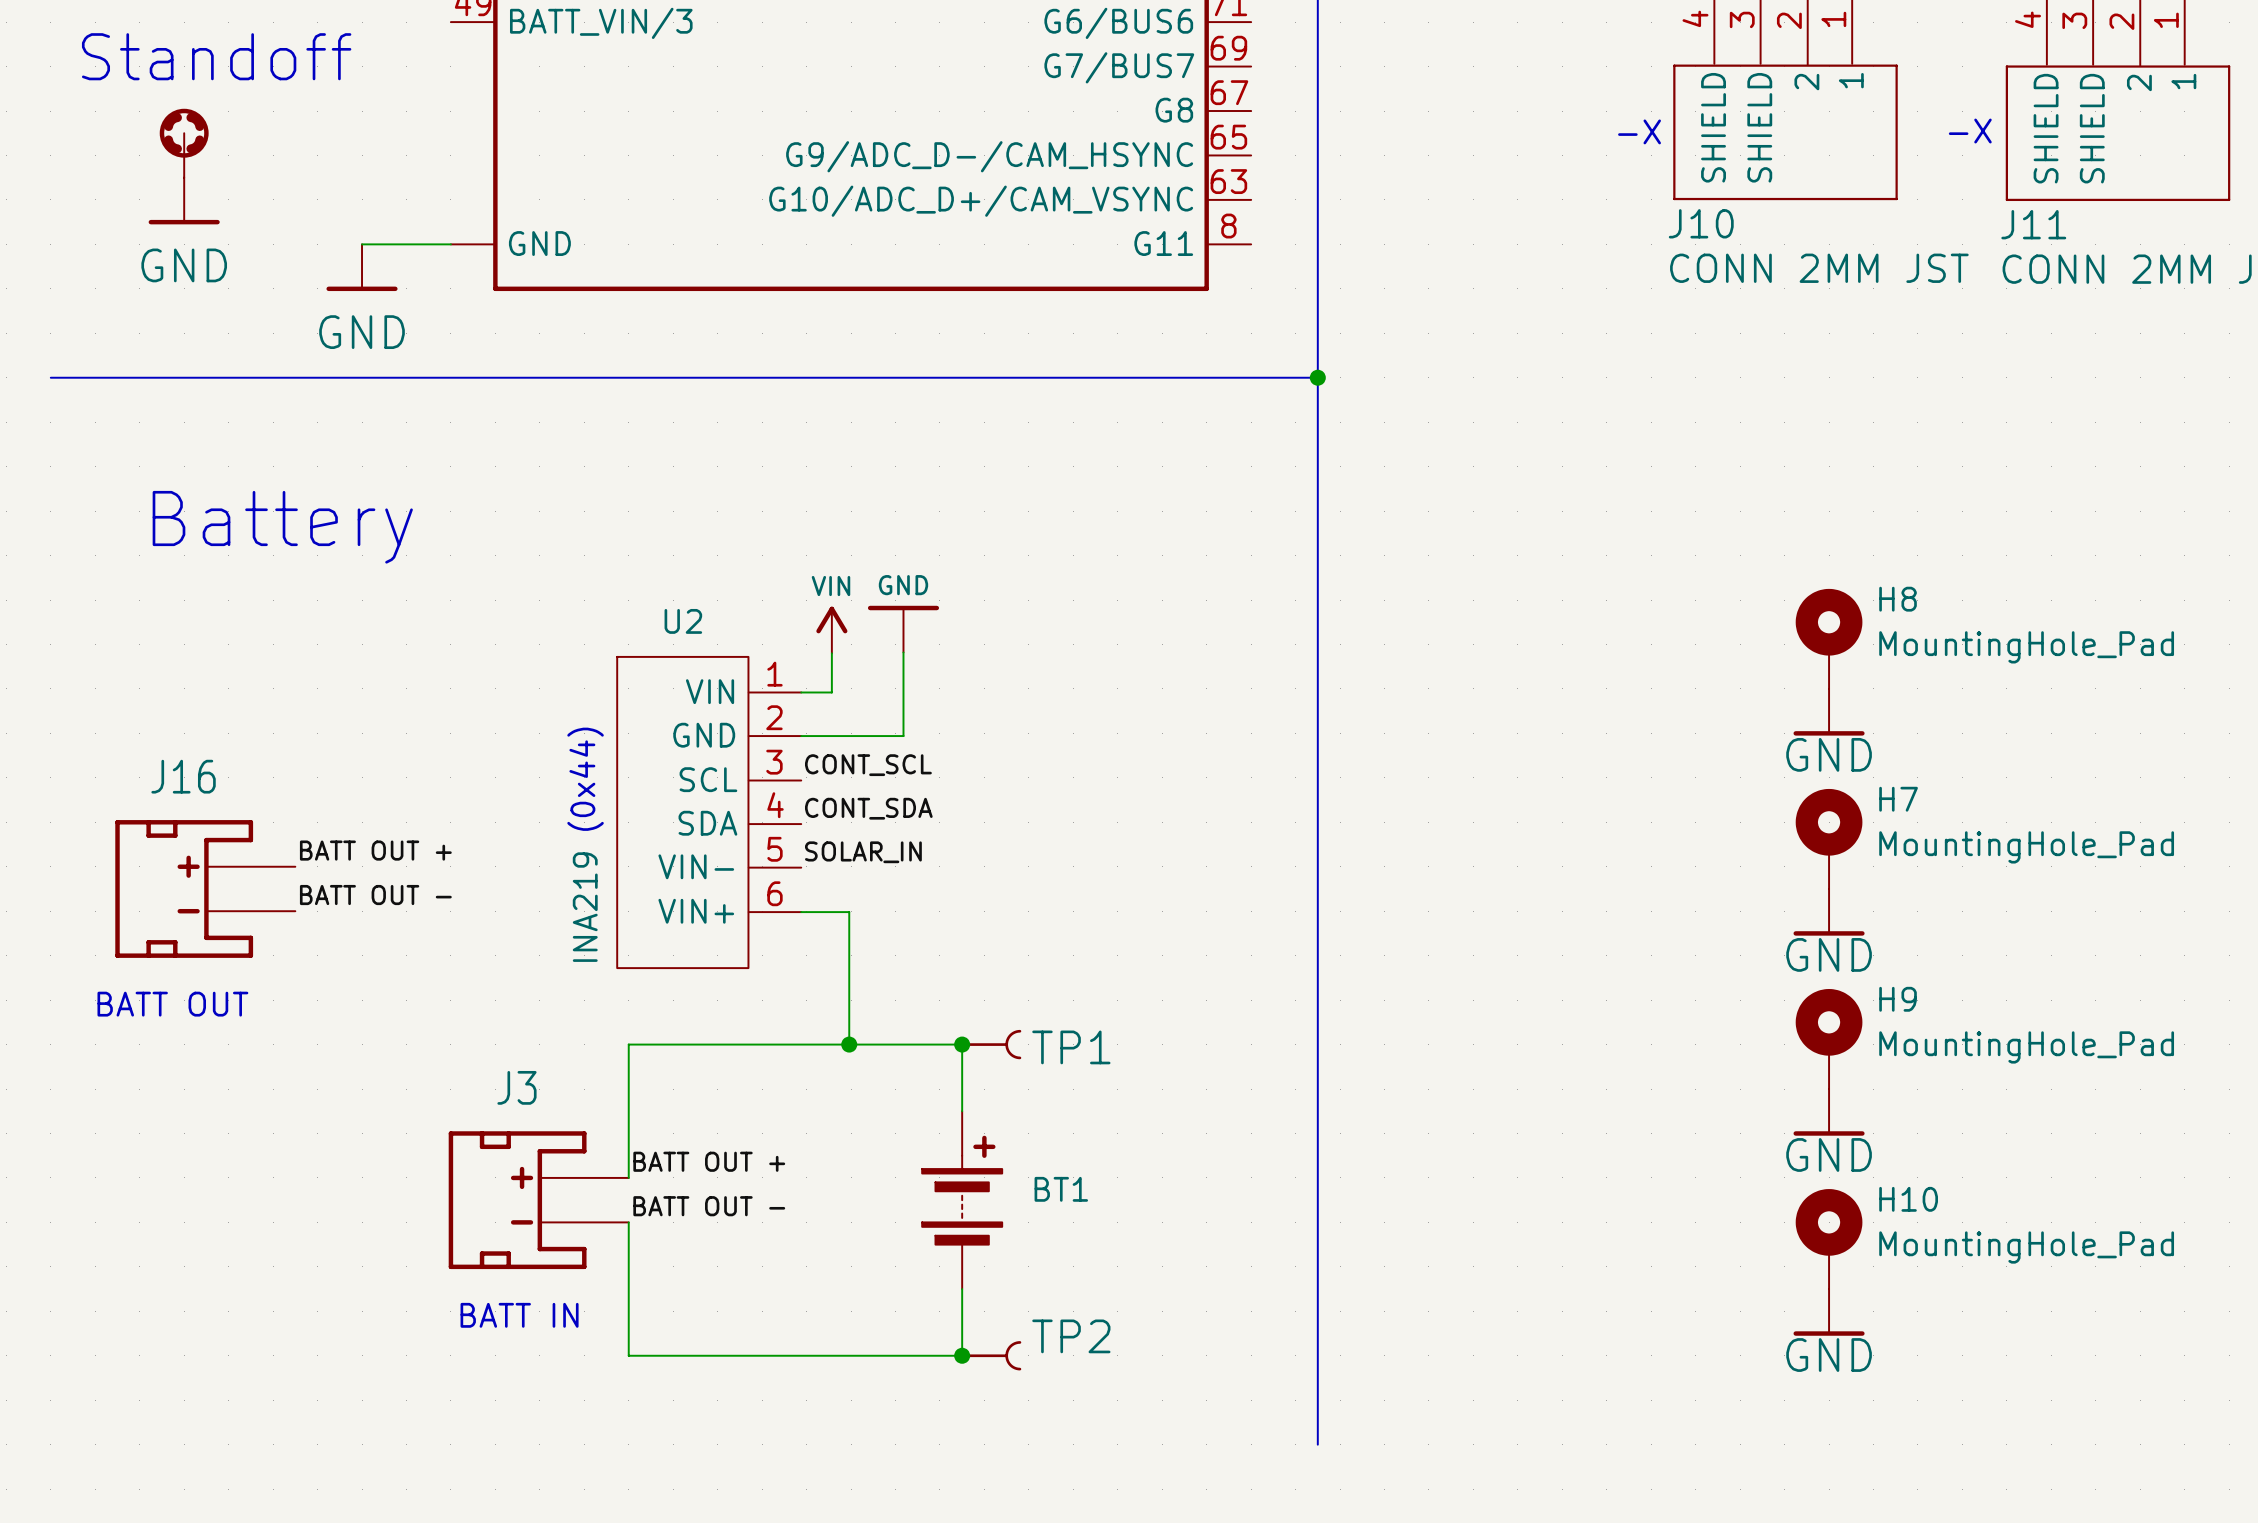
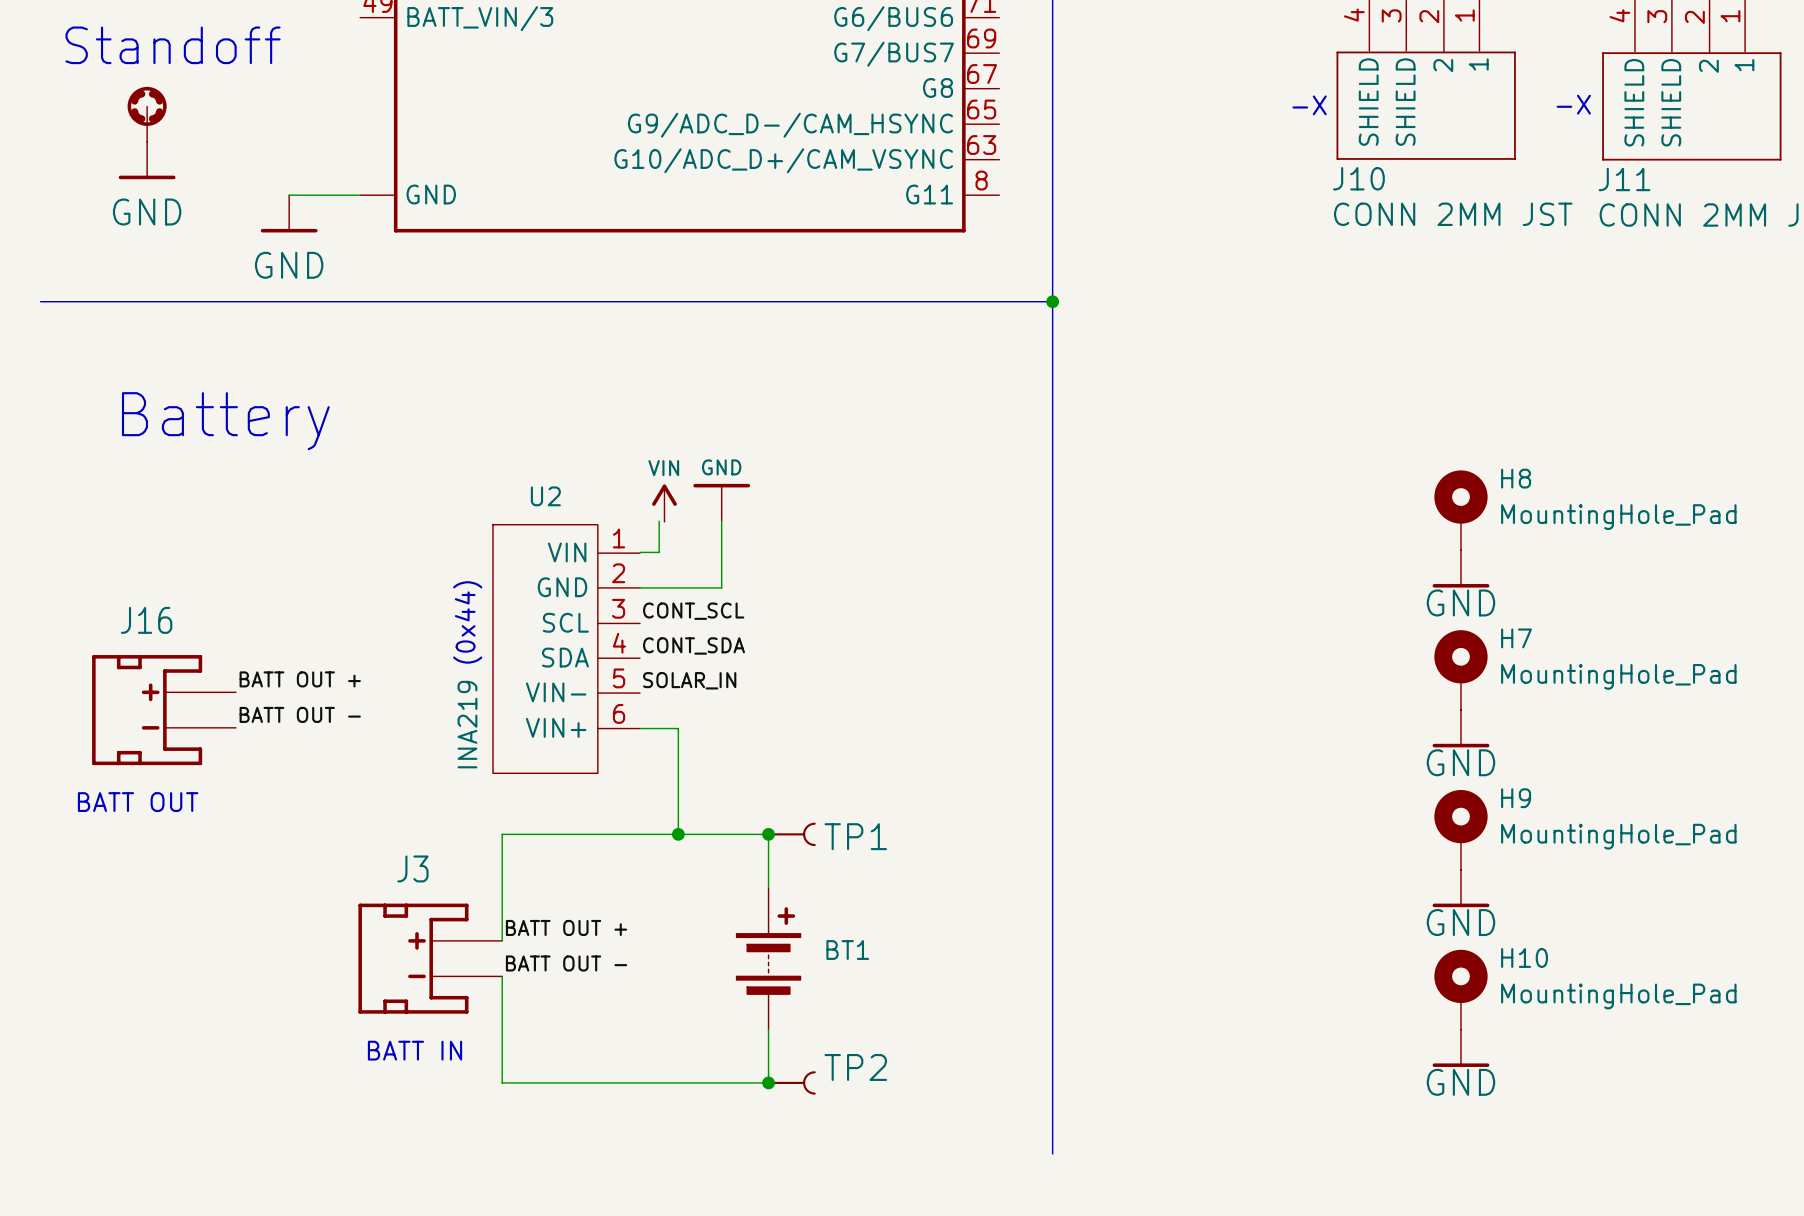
wire: none -> (659, 521) (659, 552) (640, 552)
wire: (831, 653) (831, 692) (801, 692) -> none

